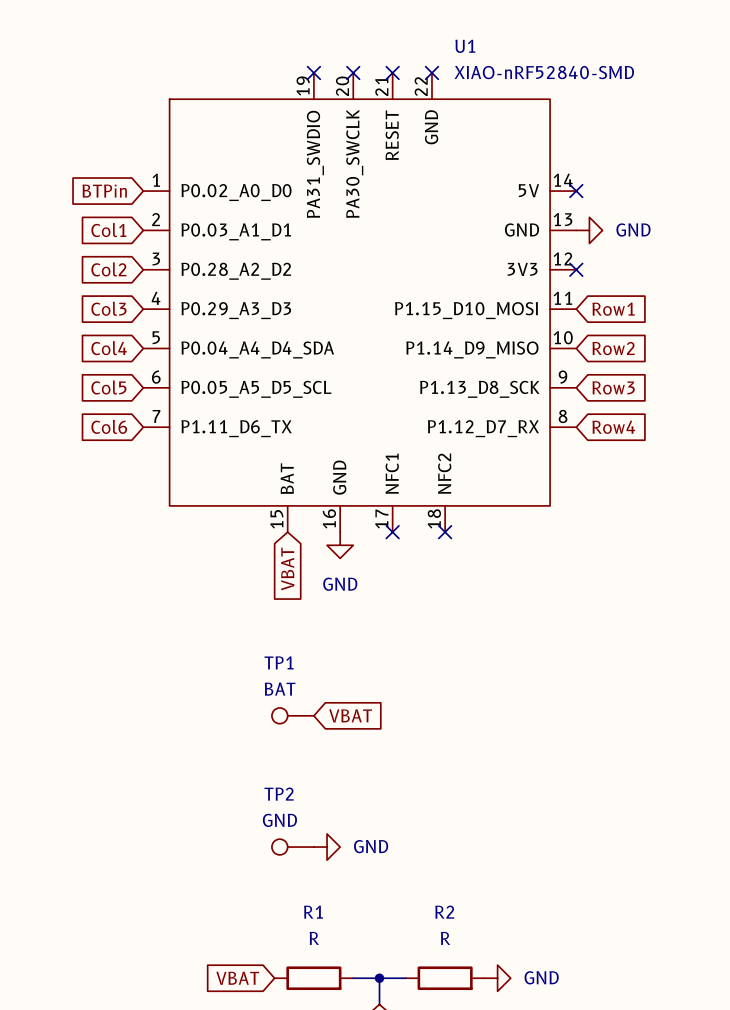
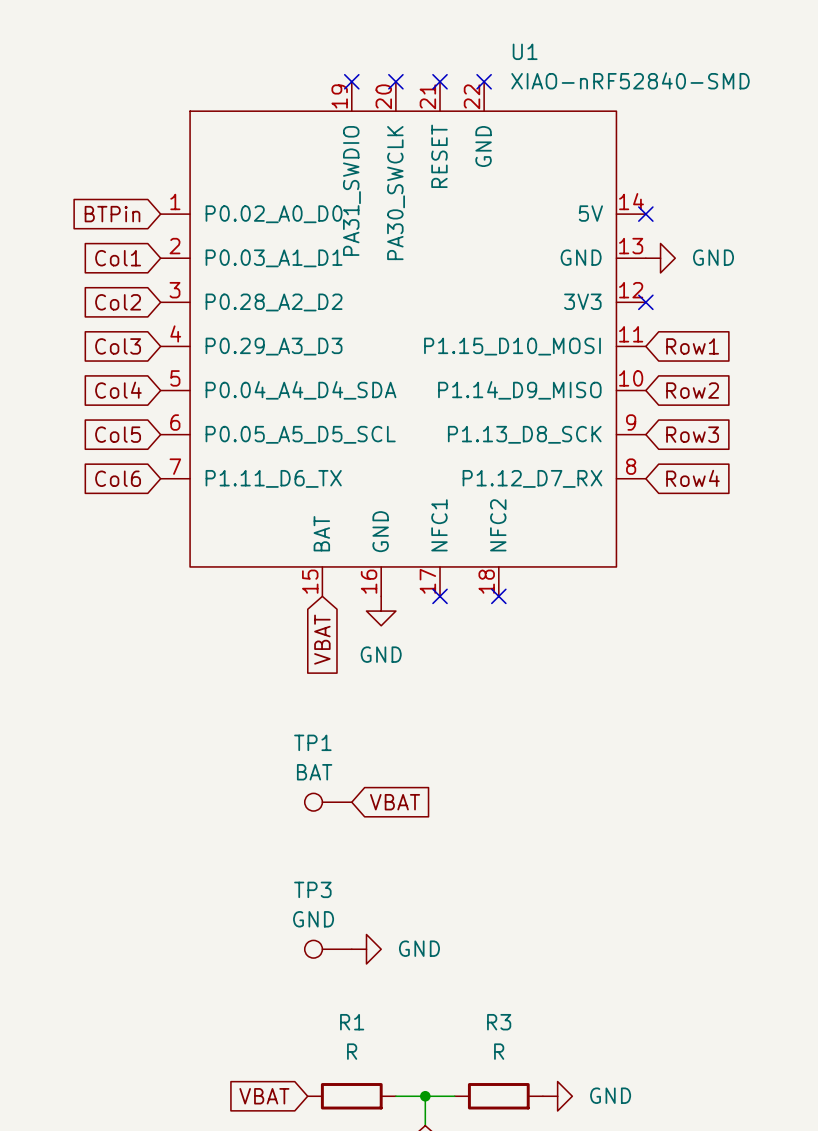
TP2 name: TP2 (279, 794) -> TP3 (312, 889)
R2 name: R2 (444, 912) -> R3 (499, 1022)

